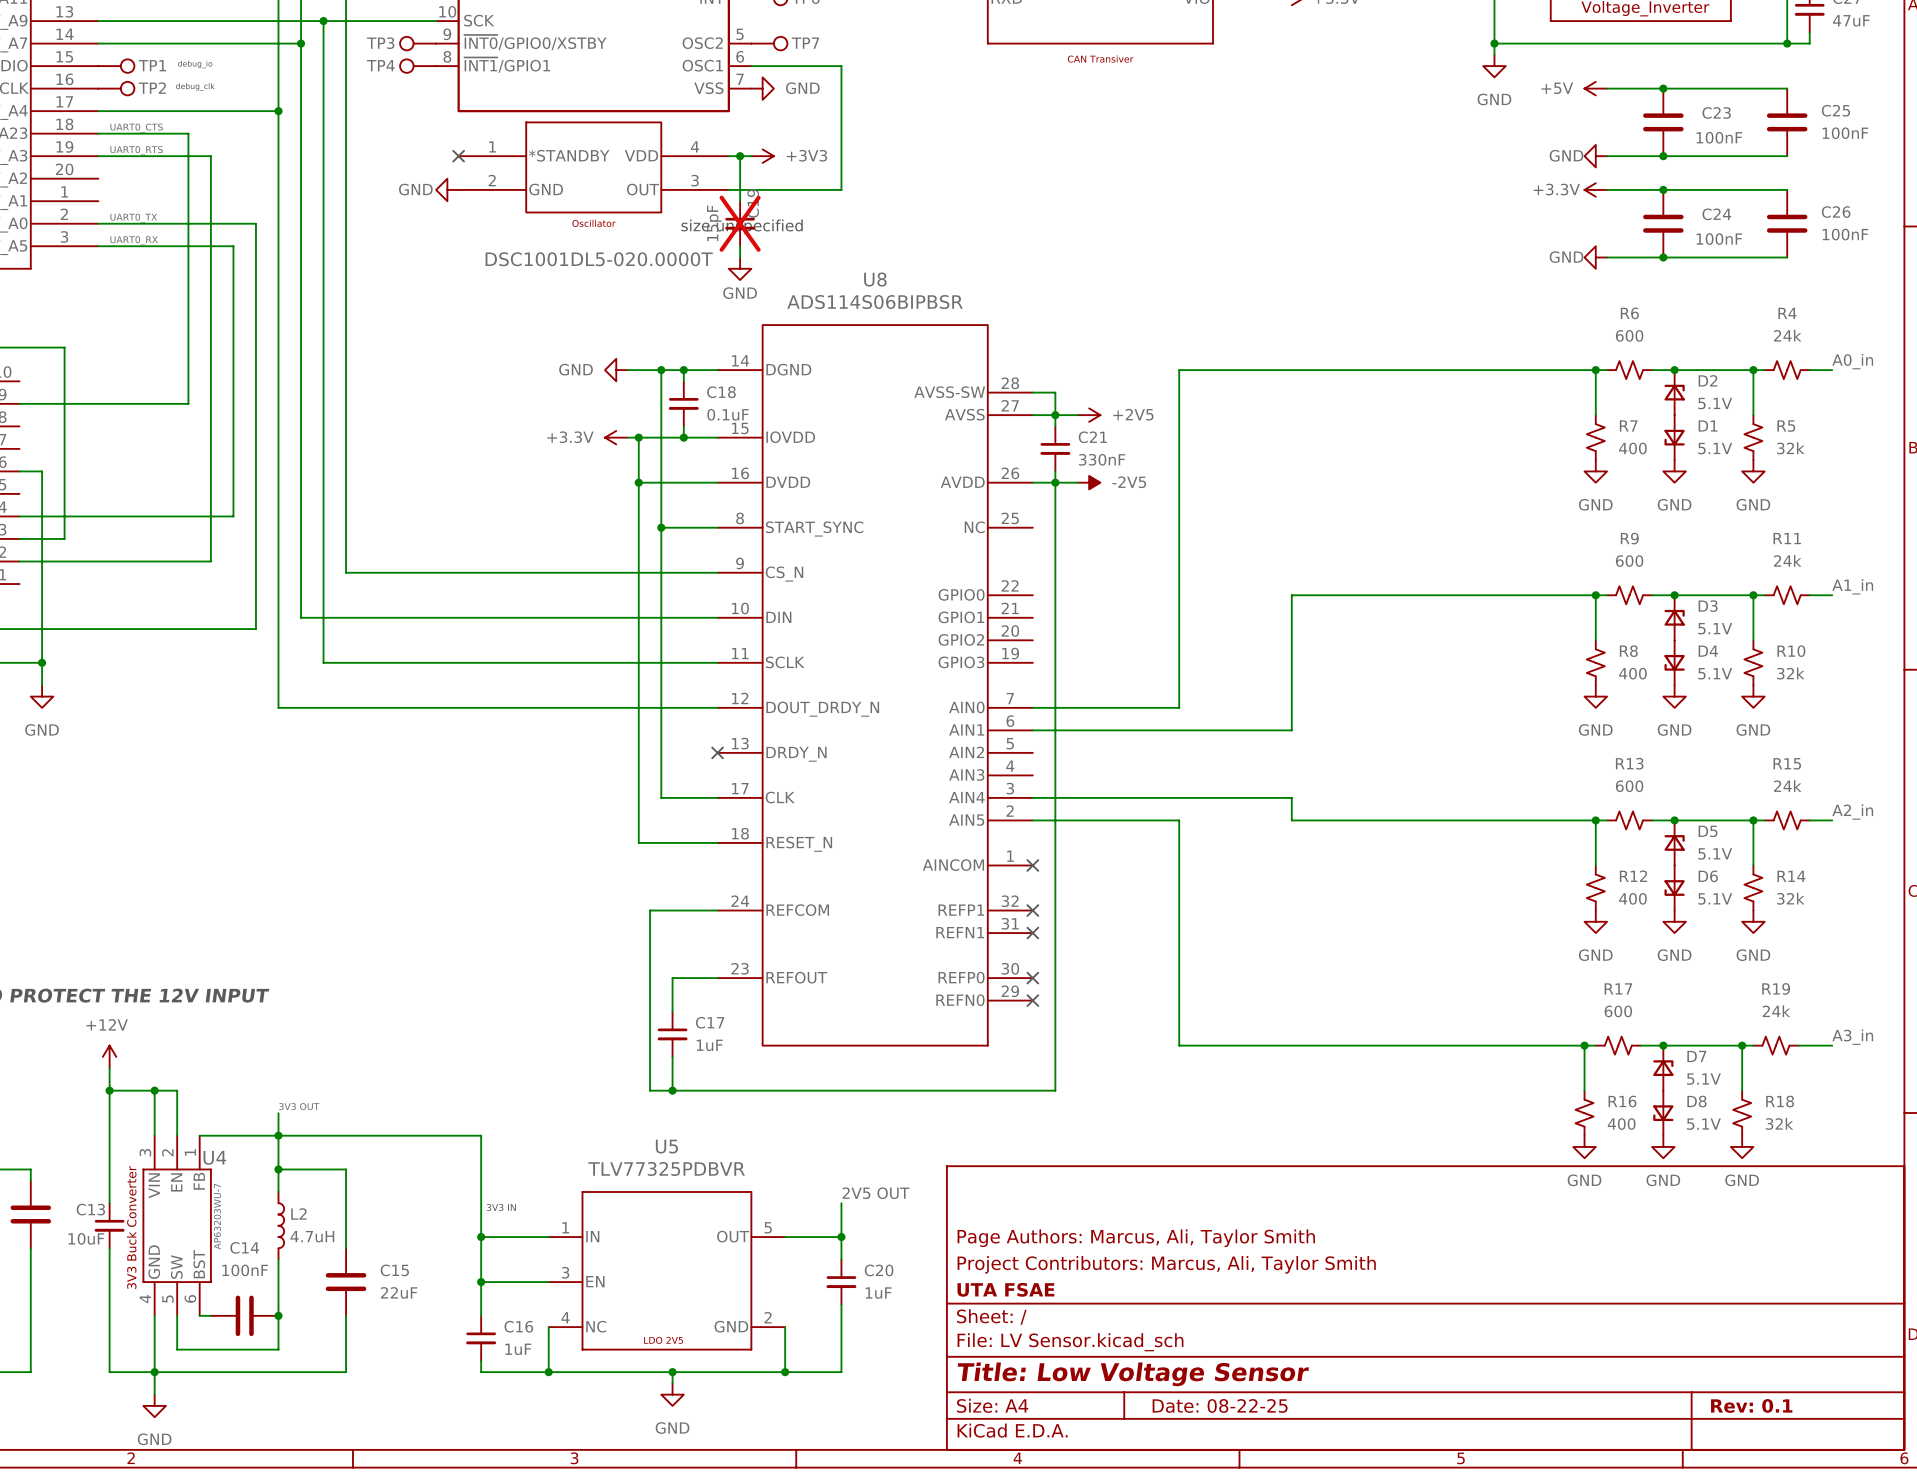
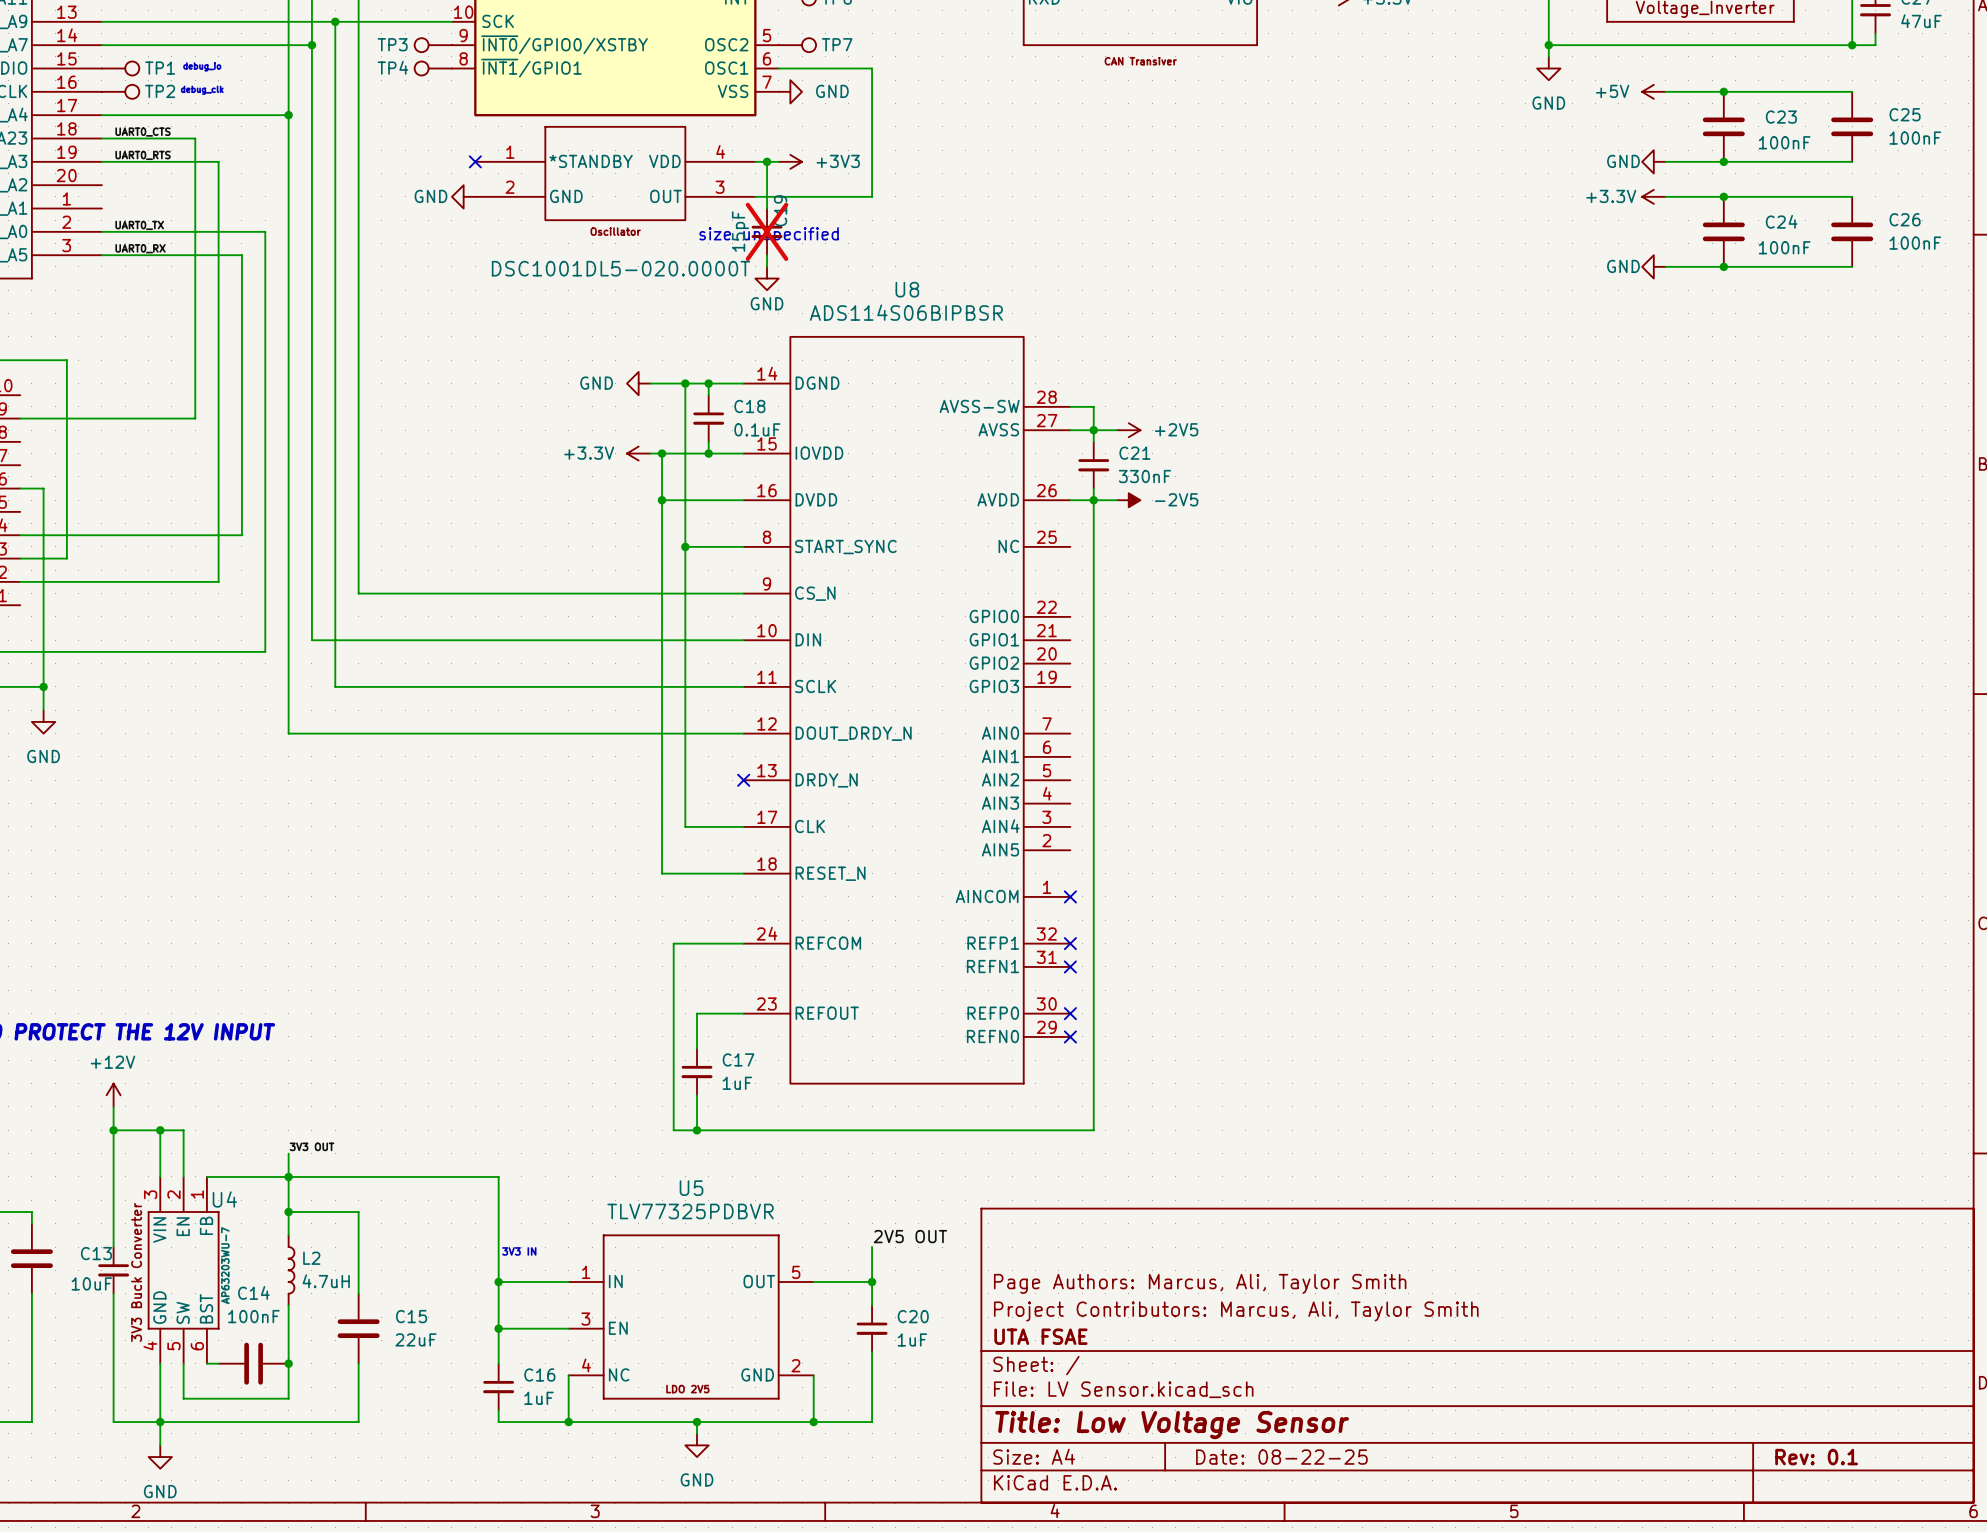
label: A0_in (1852, 361) -> none
wire: (1595, 370) (1595, 415) -> none
junction: (1595, 370) -> none
wire: (1607, 370) (1179, 370) (1179, 707) (1032, 707) -> none
R6: 600 (1629, 370) -> none
wire: (1652, 370) (1764, 370) -> none
junction: (1674, 370) -> none
wire: (1753, 370) (1753, 415) -> none
junction: (1753, 370) -> none
R4: 24k (1787, 370) -> none
wire: (1809, 370) (1832, 370) -> none
D2: 5.1V (1674, 392) -> none
R7: 400 (1595, 437) -> none
D1: 5.1V (1674, 437) -> none
R5: 32k (1753, 437) -> none
power symbol: GND (1595, 471) -> none
power symbol: GND (1674, 471) -> none
power symbol: GND (1753, 471) -> none
label: A1_in (1852, 586) -> none
wire: (1595, 595) (1595, 640) -> none
junction: (1595, 595) -> none
wire: (1607, 595) (1291, 595) (1291, 730) (1032, 730) -> none
R9: 600 (1629, 595) -> none
wire: (1652, 595) (1764, 595) -> none
junction: (1674, 595) -> none
wire: (1753, 595) (1753, 640) -> none
junction: (1753, 595) -> none
R11: 24k (1787, 595) -> none
wire: (1809, 595) (1832, 595) -> none
D3: 5.1V (1674, 617) -> none
R8: 400 (1595, 662) -> none
D4: 5.1V (1674, 662) -> none
R10: 32k (1753, 662) -> none
power symbol: GND (1595, 696) -> none
power symbol: GND (1674, 696) -> none
power symbol: GND (1753, 696) -> none
wire: (1032, 797) (1291, 797) (1291, 820) (1607, 820) -> none
label: A2_in (1852, 811) -> none
wire: (1032, 820) (1179, 820) (1179, 1045) (1595, 1045) -> none
wire: (1595, 820) (1595, 865) -> none
junction: (1595, 820) -> none
R13: 600 (1629, 820) -> none
wire: (1652, 820) (1764, 820) -> none
junction: (1674, 820) -> none
wire: (1753, 820) (1753, 865) -> none
junction: (1753, 820) -> none
R15: 24k (1787, 820) -> none
wire: (1809, 820) (1832, 820) -> none
D5: 5.1V (1674, 842) -> none
R12: 400 (1595, 888) -> none
D6: 5.1V (1674, 888) -> none
R14: 32k (1753, 888) -> none
power symbol: GND (1595, 921) -> none
power symbol: GND (1674, 921) -> none
power symbol: GND (1753, 921) -> none
label: A3_in (1852, 1037) -> none
wire: (1584, 1045) (1584, 1090) -> none
junction: (1584, 1045) -> none
R17: 600 (1618, 1045) -> none
wire: (1640, 1045) (1753, 1045) -> none
junction: (1663, 1045) -> none
wire: (1742, 1045) (1742, 1090) -> none
junction: (1742, 1045) -> none
R19: 24k (1775, 1045) -> none
wire: (1798, 1045) (1832, 1045) -> none
D7: 5.1V (1663, 1068) -> none
R16: 400 (1584, 1113) -> none
D8: 5.1V (1663, 1113) -> none
R18: 32k (1742, 1113) -> none
power symbol: GND (1584, 1146) -> none
power symbol: GND (1663, 1146) -> none
power symbol: GND (1742, 1146) -> none

